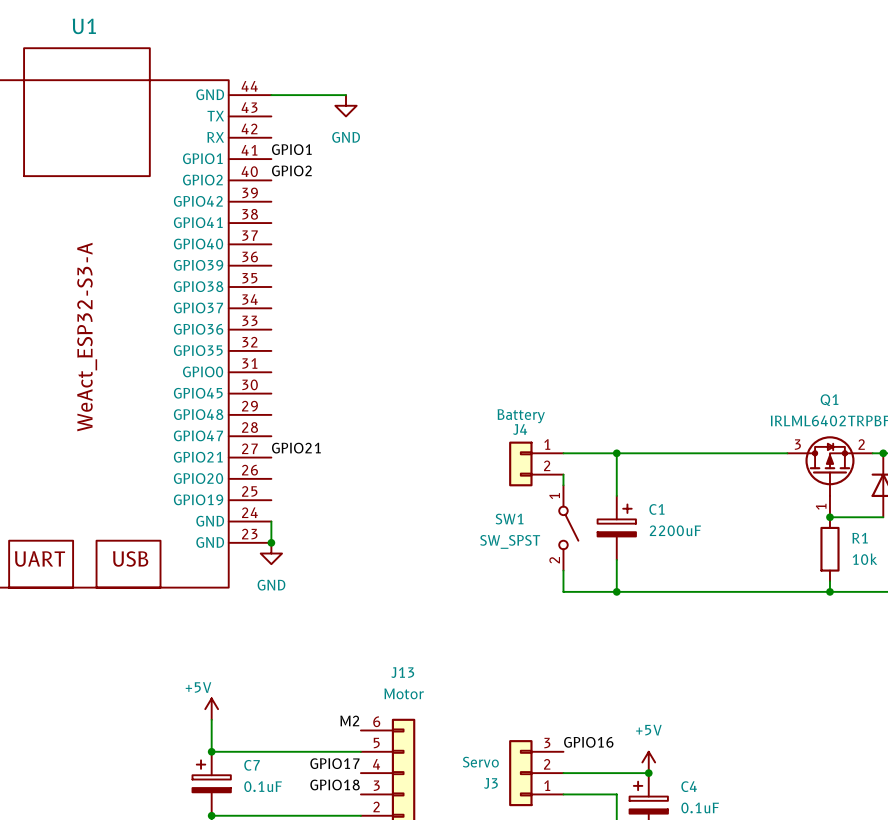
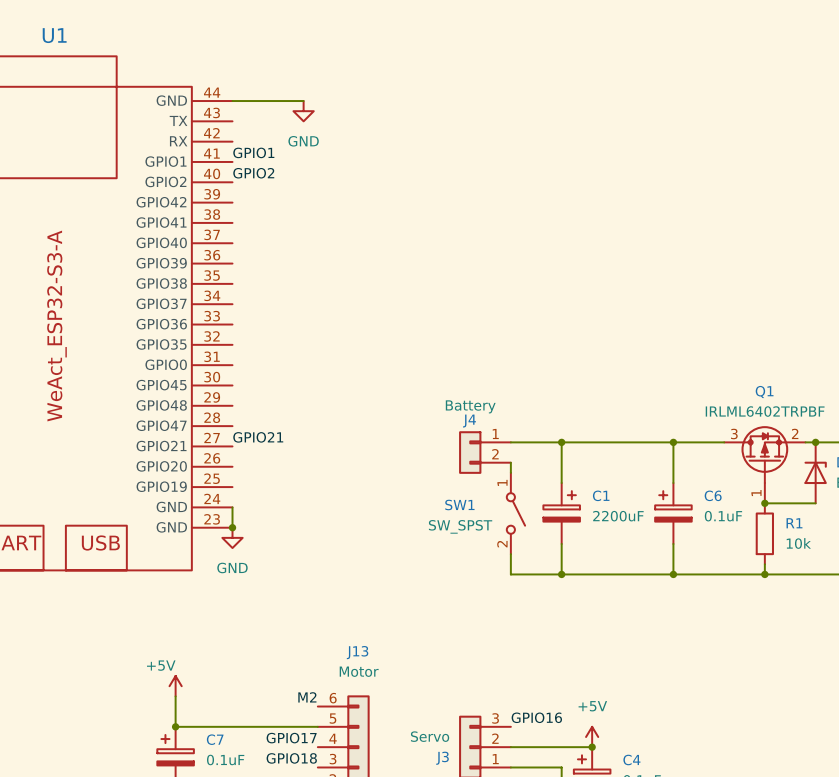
wire: none -> (673, 442) (673, 483)
junction: none -> (673, 442)
C6: none -> 0.1uF (673, 513)
wire: none -> (673, 543) (673, 574)
junction: none -> (673, 574)

